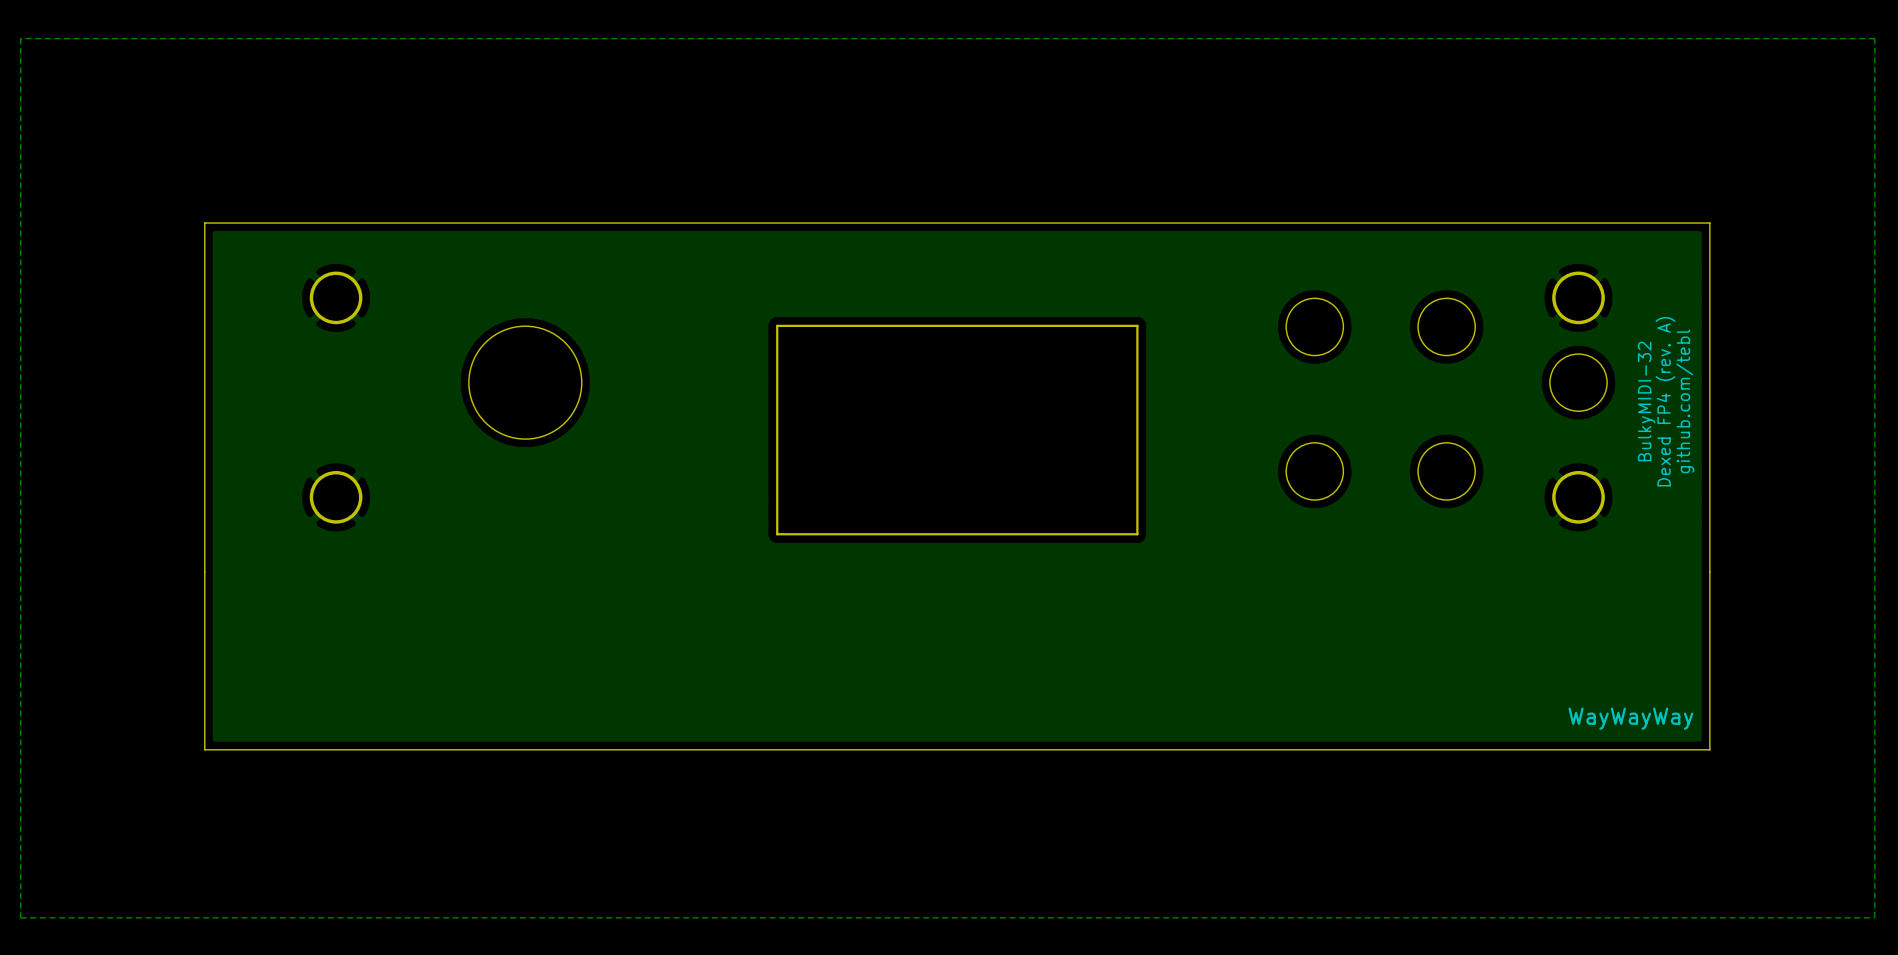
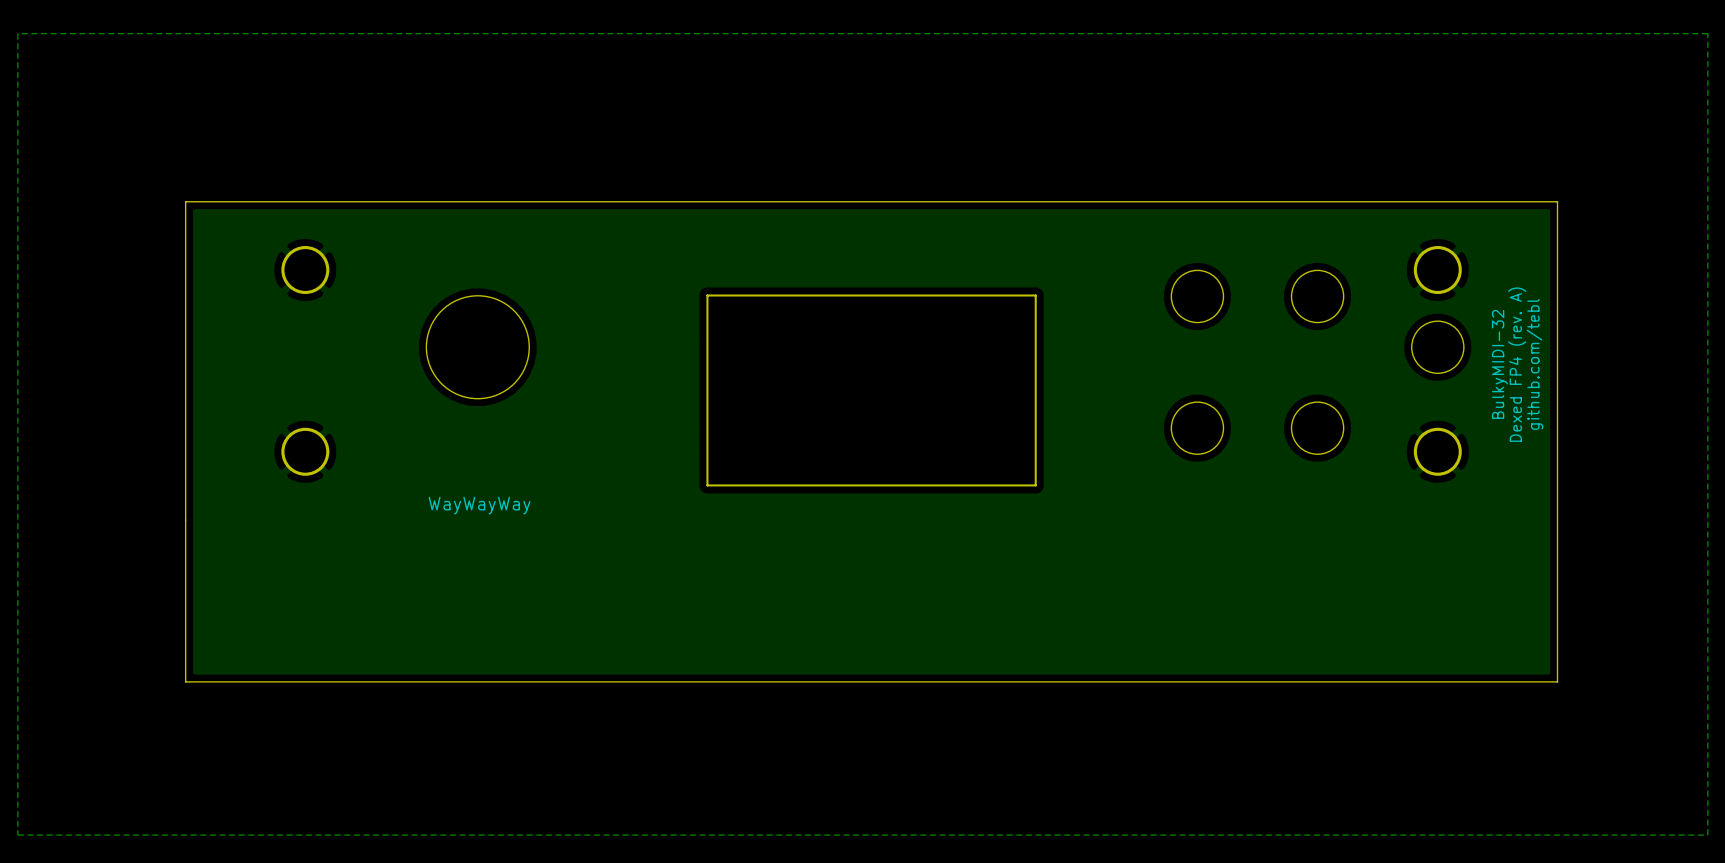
text: none -> WayWayWay (479, 505)
text: WayWayWay (1630, 718) -> none

